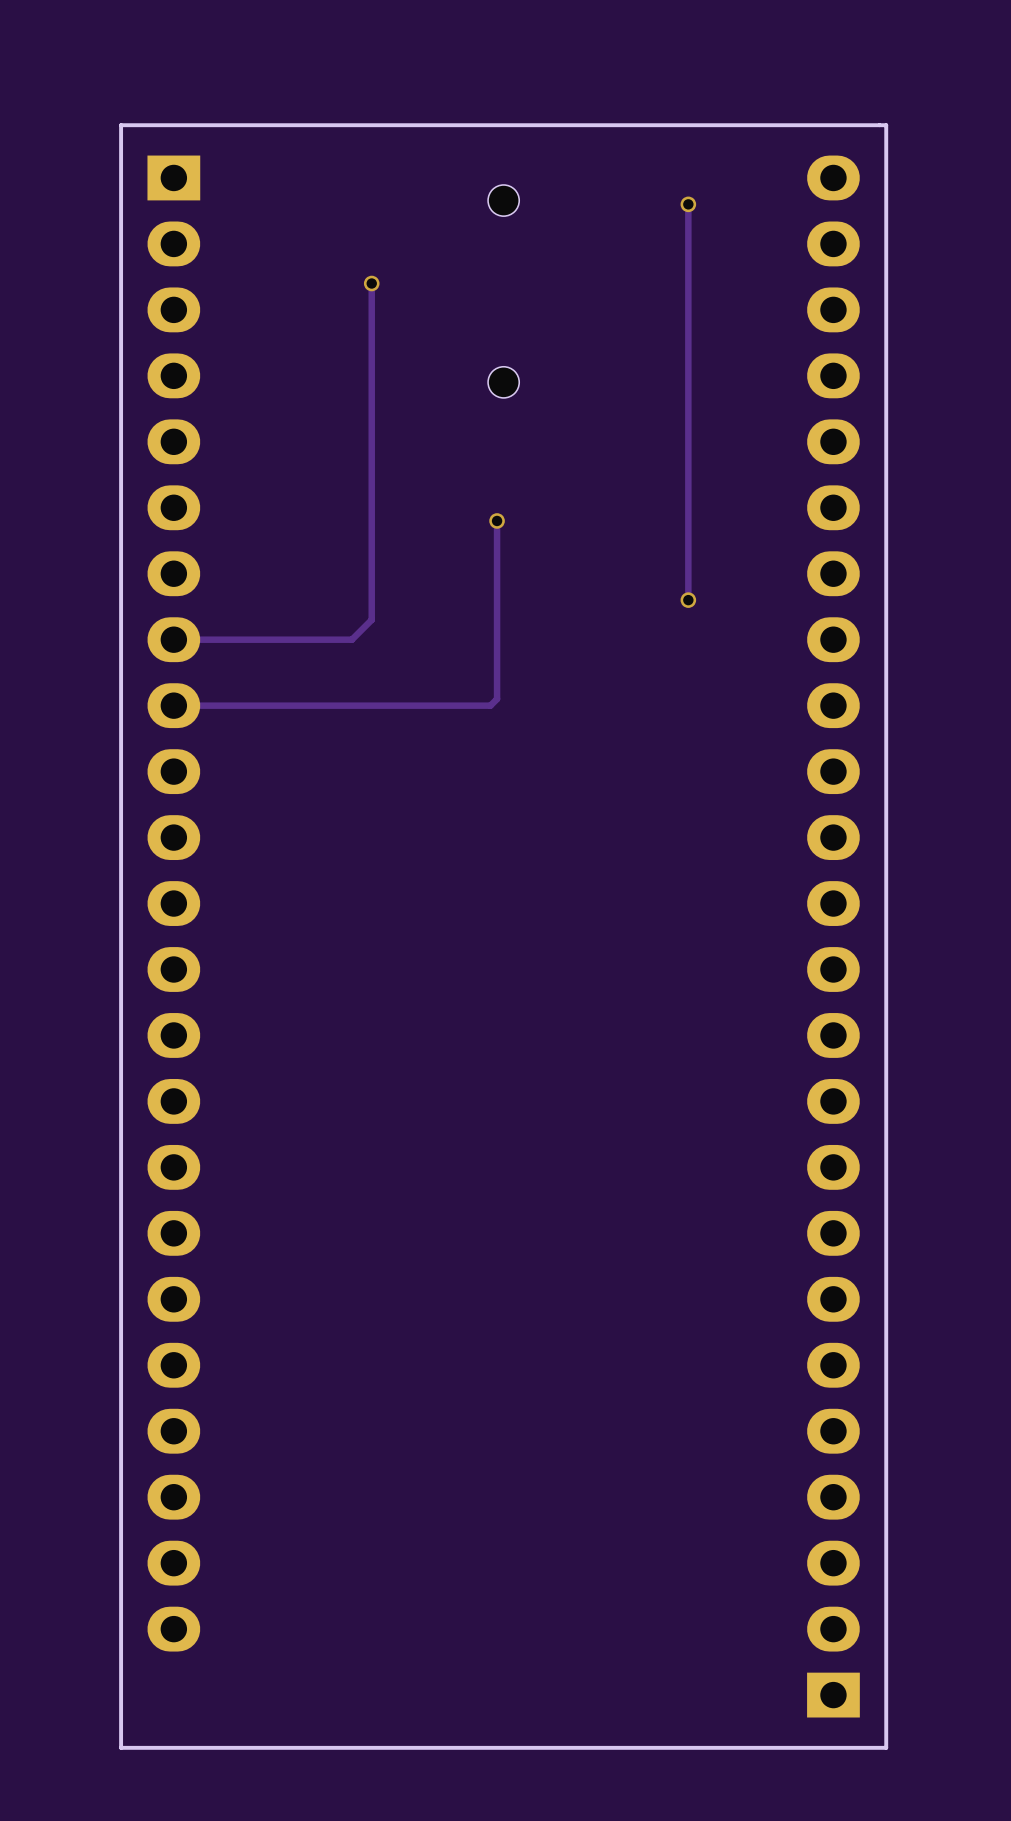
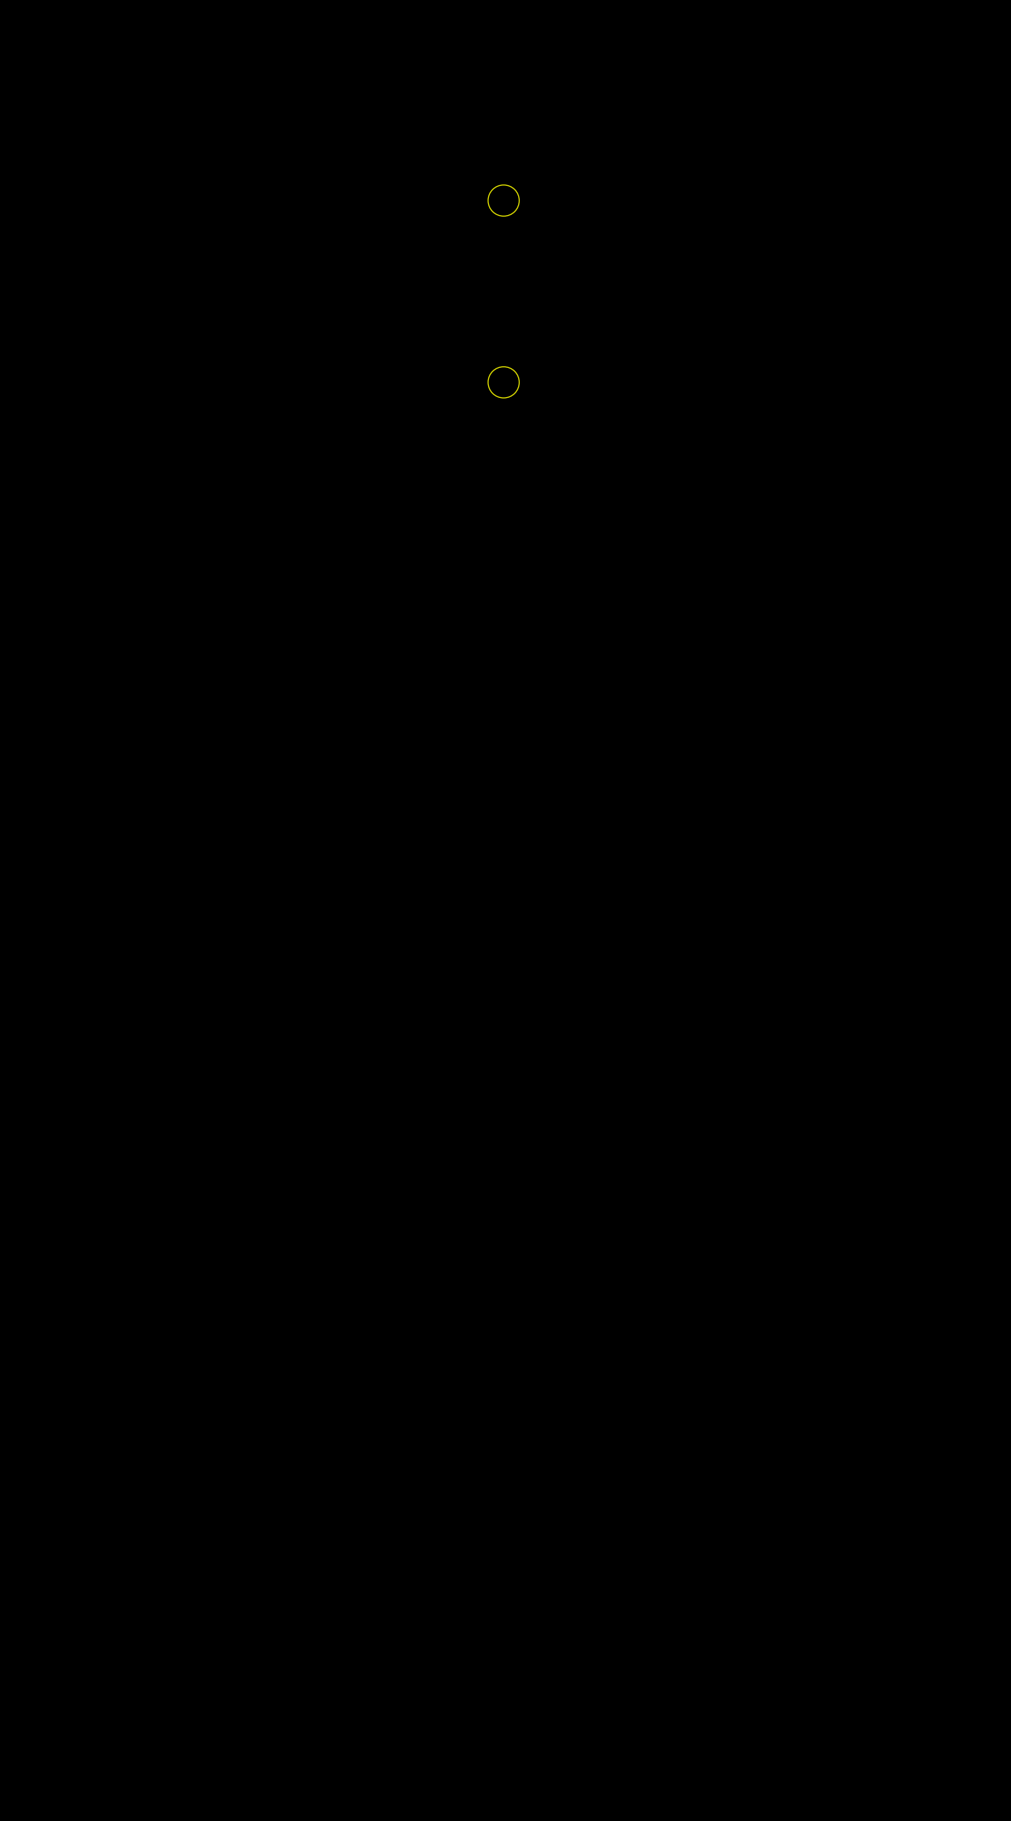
board edge: (886, 125) (121, 125) (121, 1747) (886, 1747) (886, 125) -> none
track: (688, 204) (688, 600) -> none
via: (688, 204) -> none
track: (371, 283) (371, 619) (351, 639) (173, 639) -> none
via: (371, 283) -> none
track: (497, 520) (497, 699) (490, 705) (173, 705) -> none
via: (497, 520) -> none
via: (688, 600) -> none
part: (173, 903) -> none
part: (833, 936) -> none

